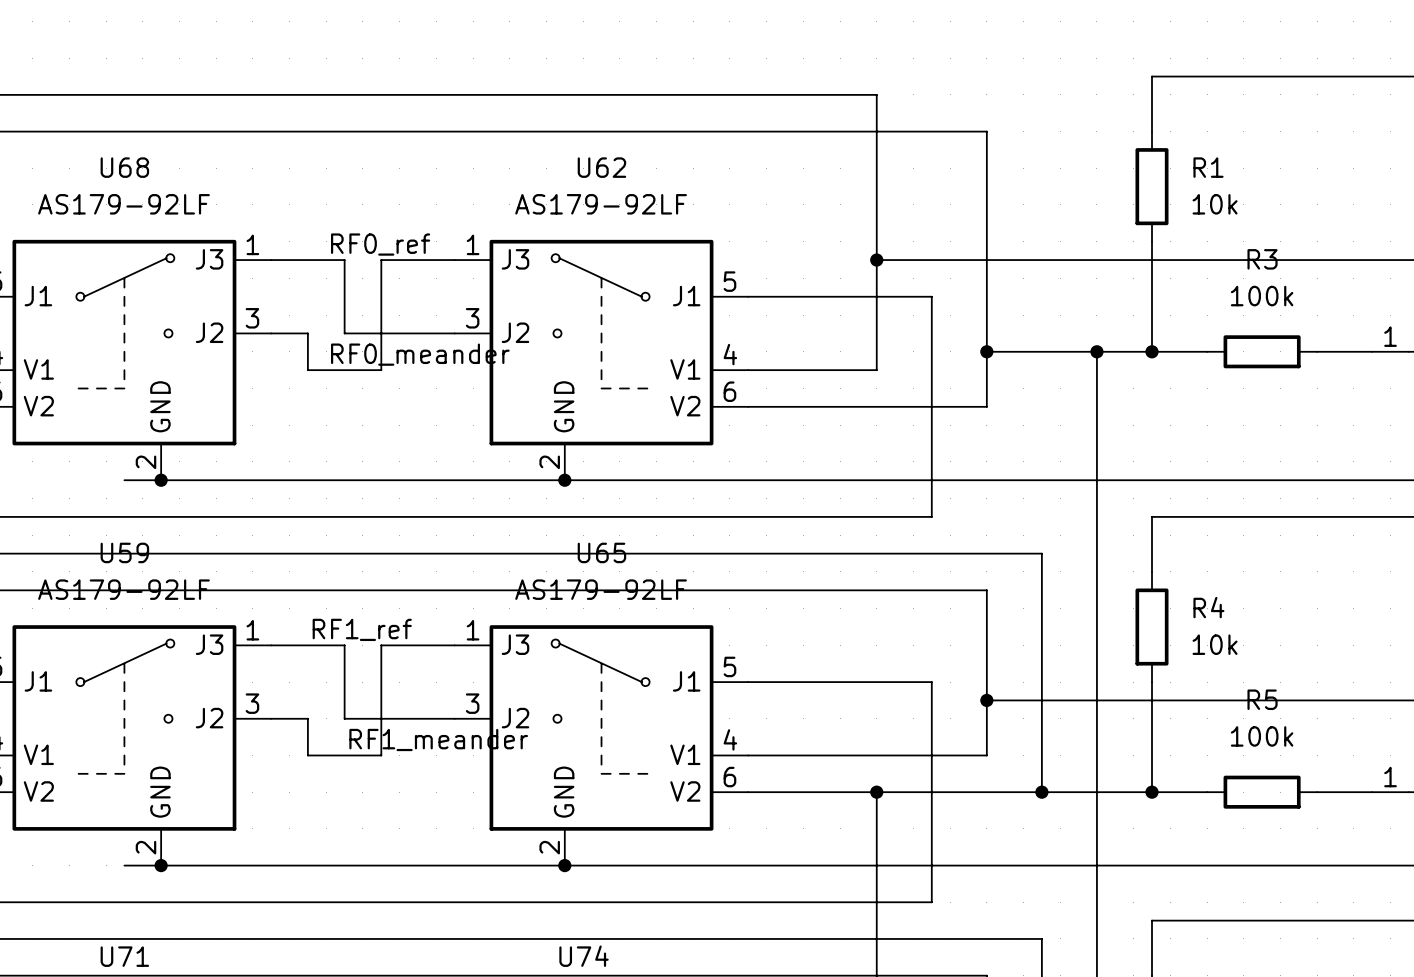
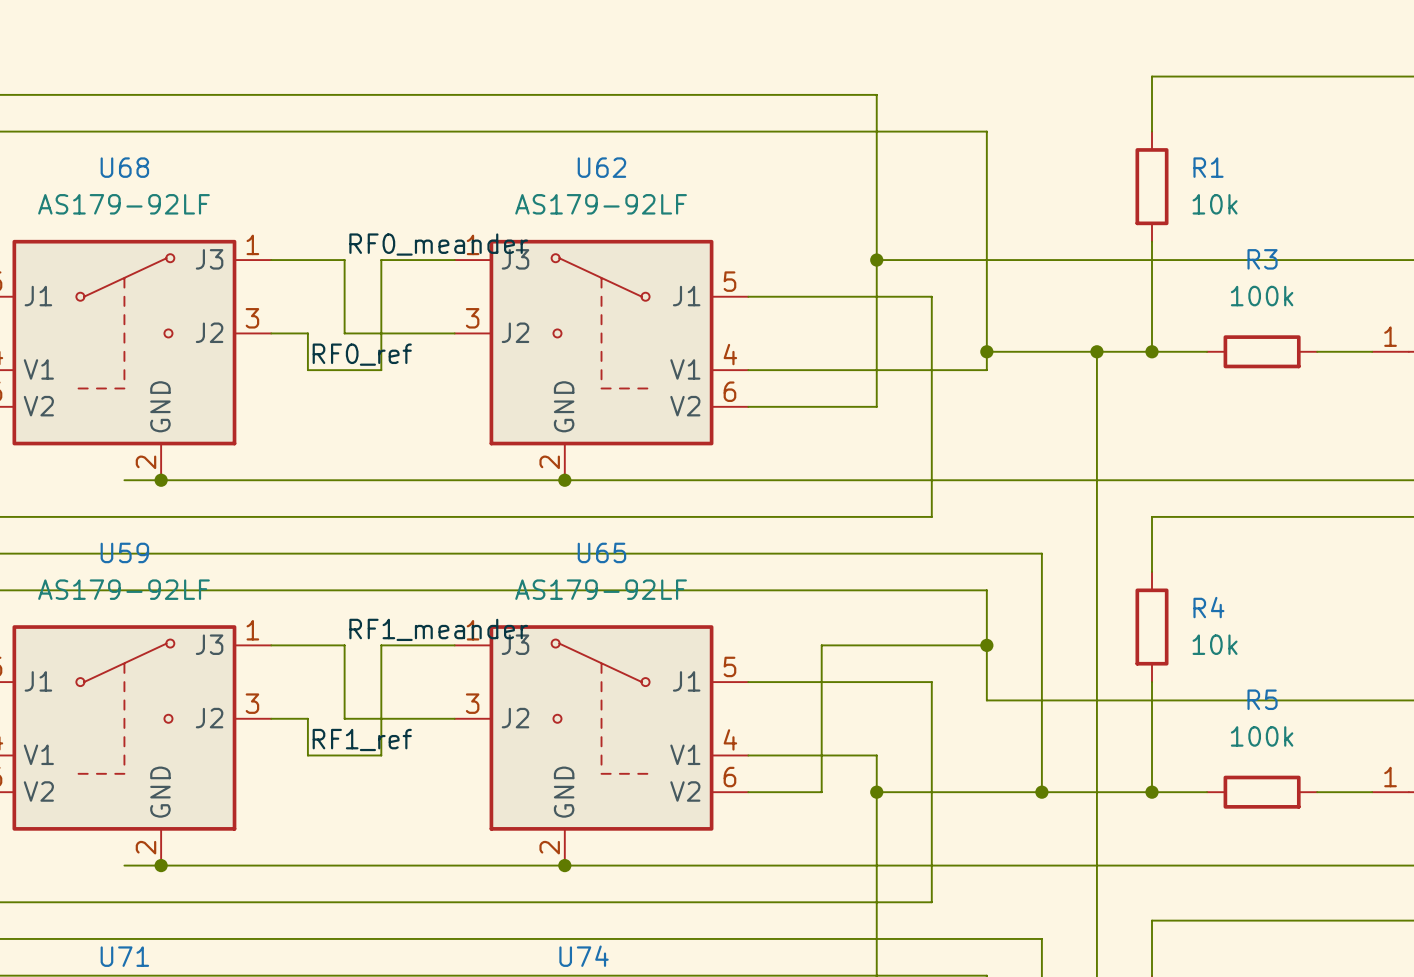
label position: RF0_ref (380, 244) -> RF0_ref (362, 354)
label position: RF0_meander (420, 354) -> RF0_meander (438, 244)
wire: (986, 370) (986, 406) (876, 406) -> (986, 370) (876, 370) (876, 406)
label position: RF1_ref (362, 629) -> RF1_ref (362, 739)
wire: none -> (986, 645) (821, 645) (821, 792)
wire: (986, 700) (986, 755) (876, 755) -> none
junction position: (986, 700) -> (986, 645)
label position: RF1_meander (438, 739) -> RF1_meander (438, 629)
wire: (821, 792) (876, 792) -> (876, 755) (876, 792)

